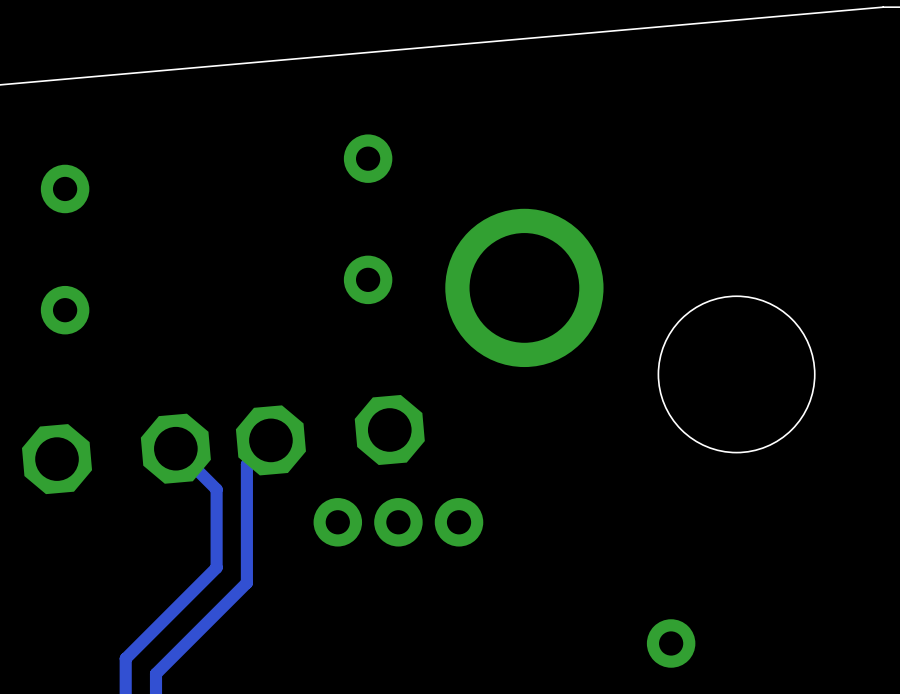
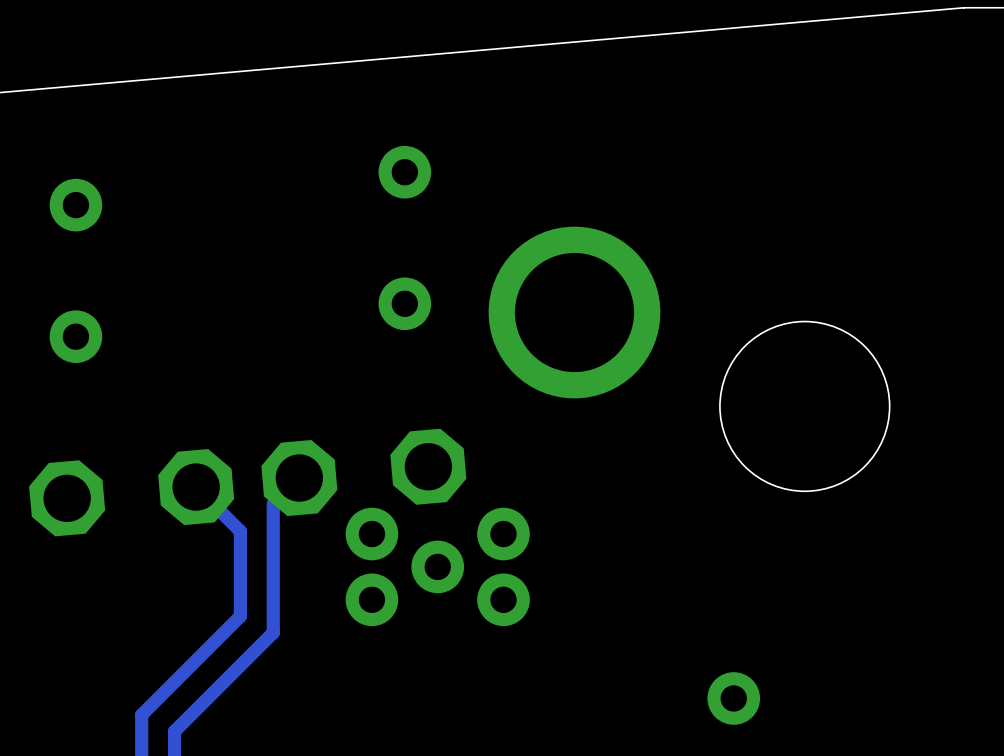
via: none -> (371, 534)
via: none -> (503, 534)
via: (337, 522) -> none
via: (459, 522) -> none
via: none -> (371, 599)
via: none -> (503, 599)

